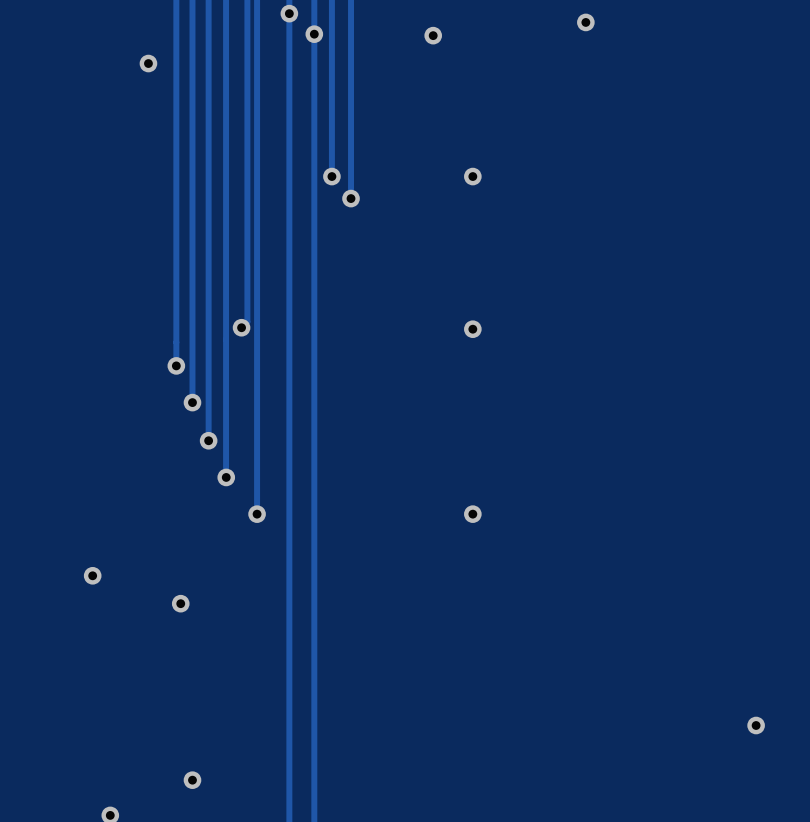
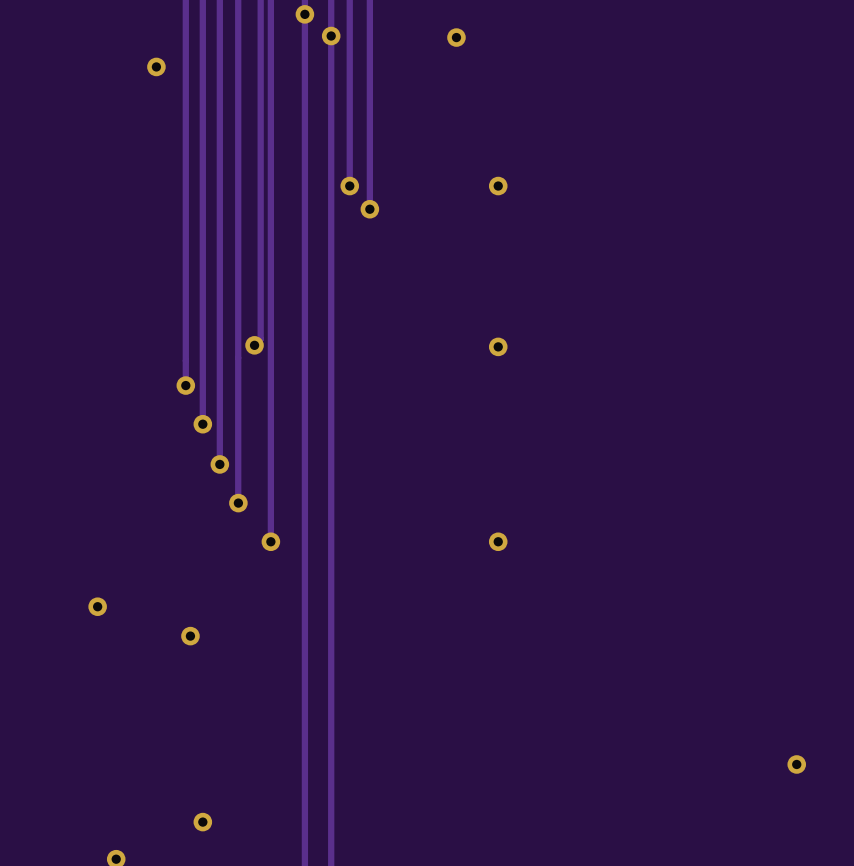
via: (585, 22) -> none

